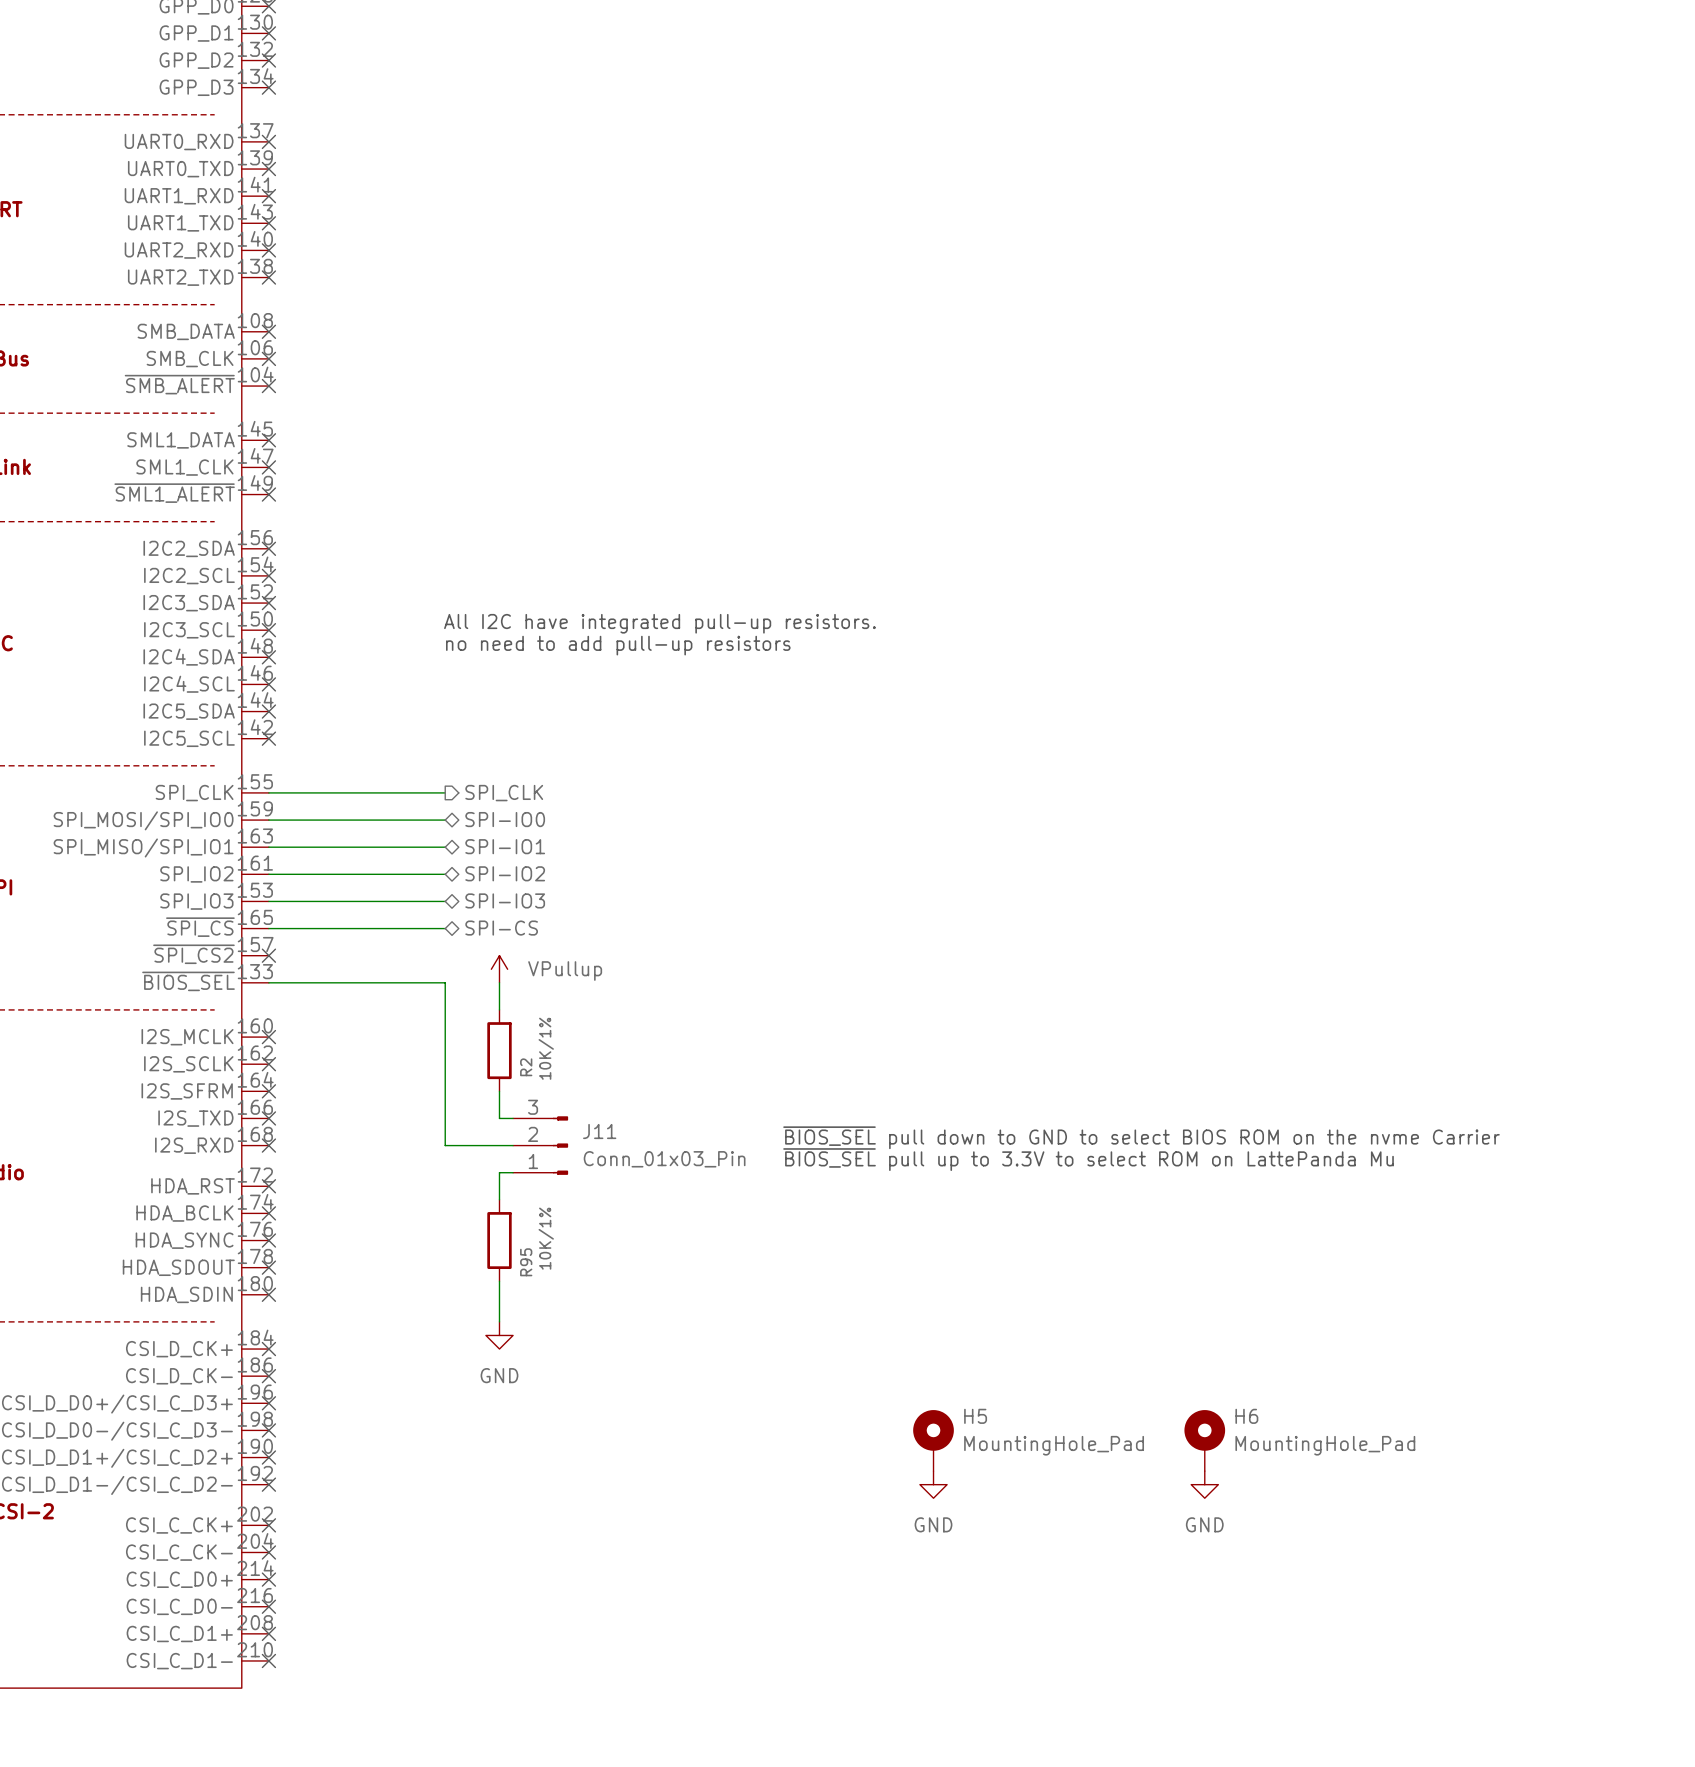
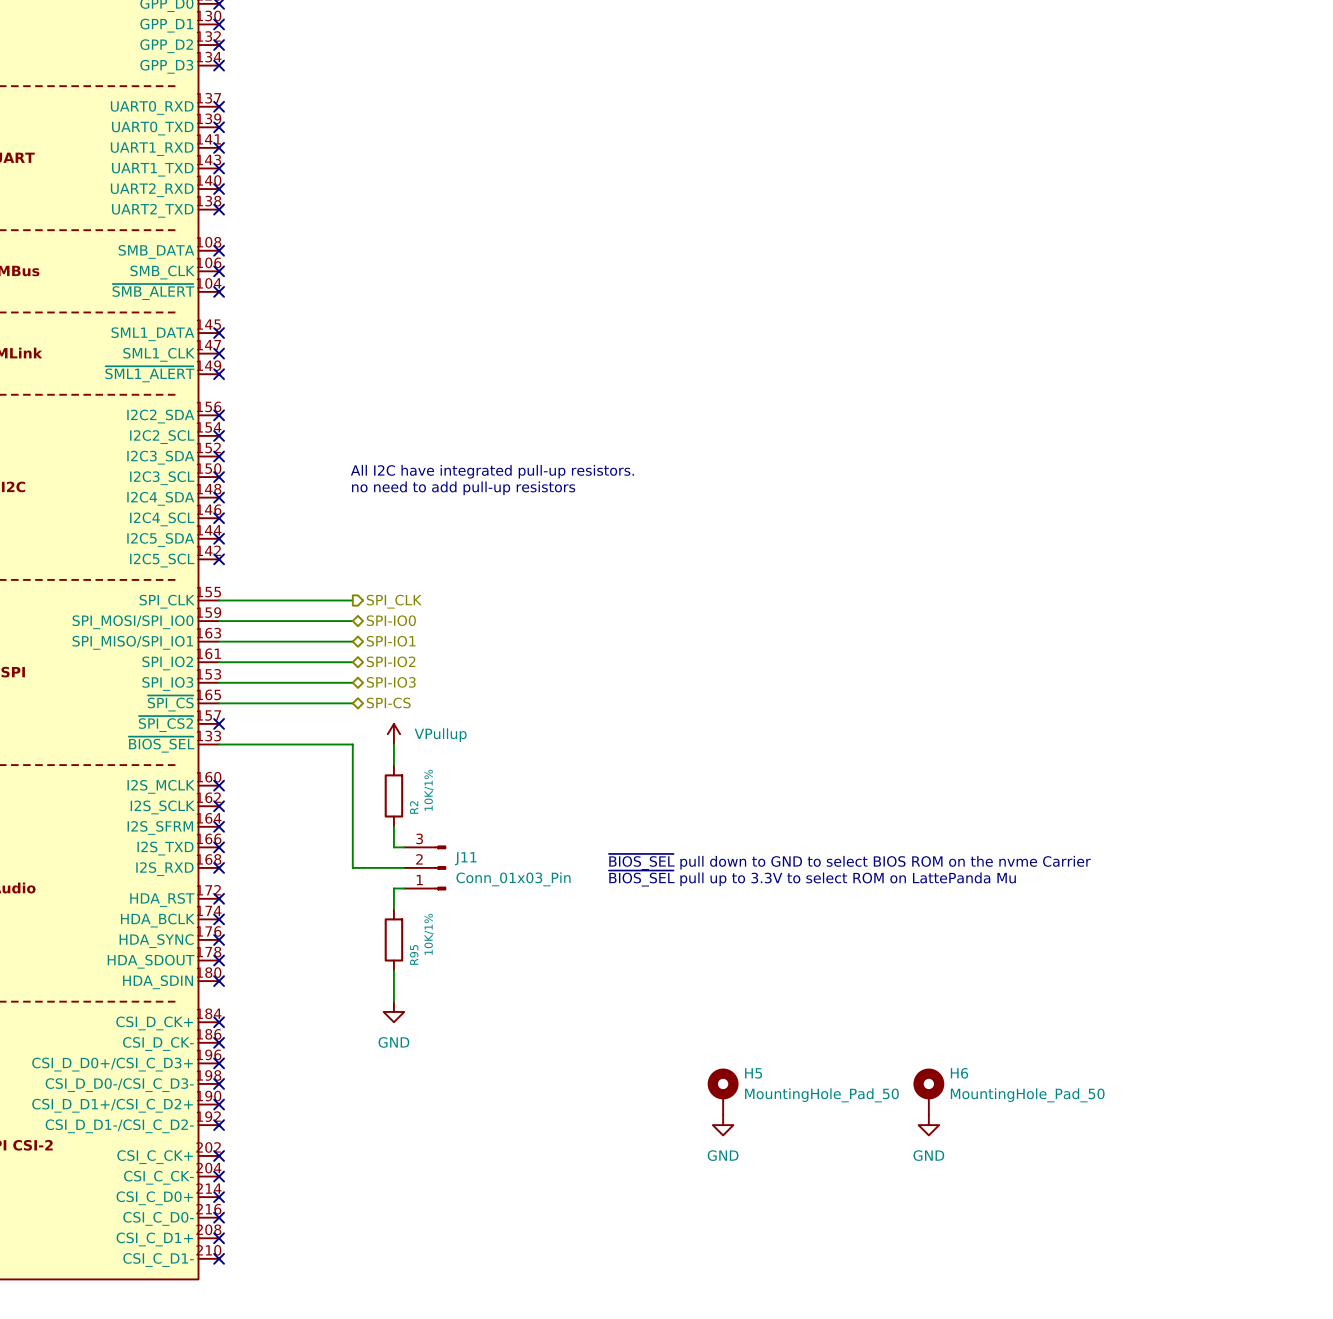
H5 value: MountingHole_Pad (1054, 1445) -> MountingHole_Pad_50 (821, 1095)
H6 value: MountingHole_Pad (1325, 1445) -> MountingHole_Pad_50 (1027, 1095)

